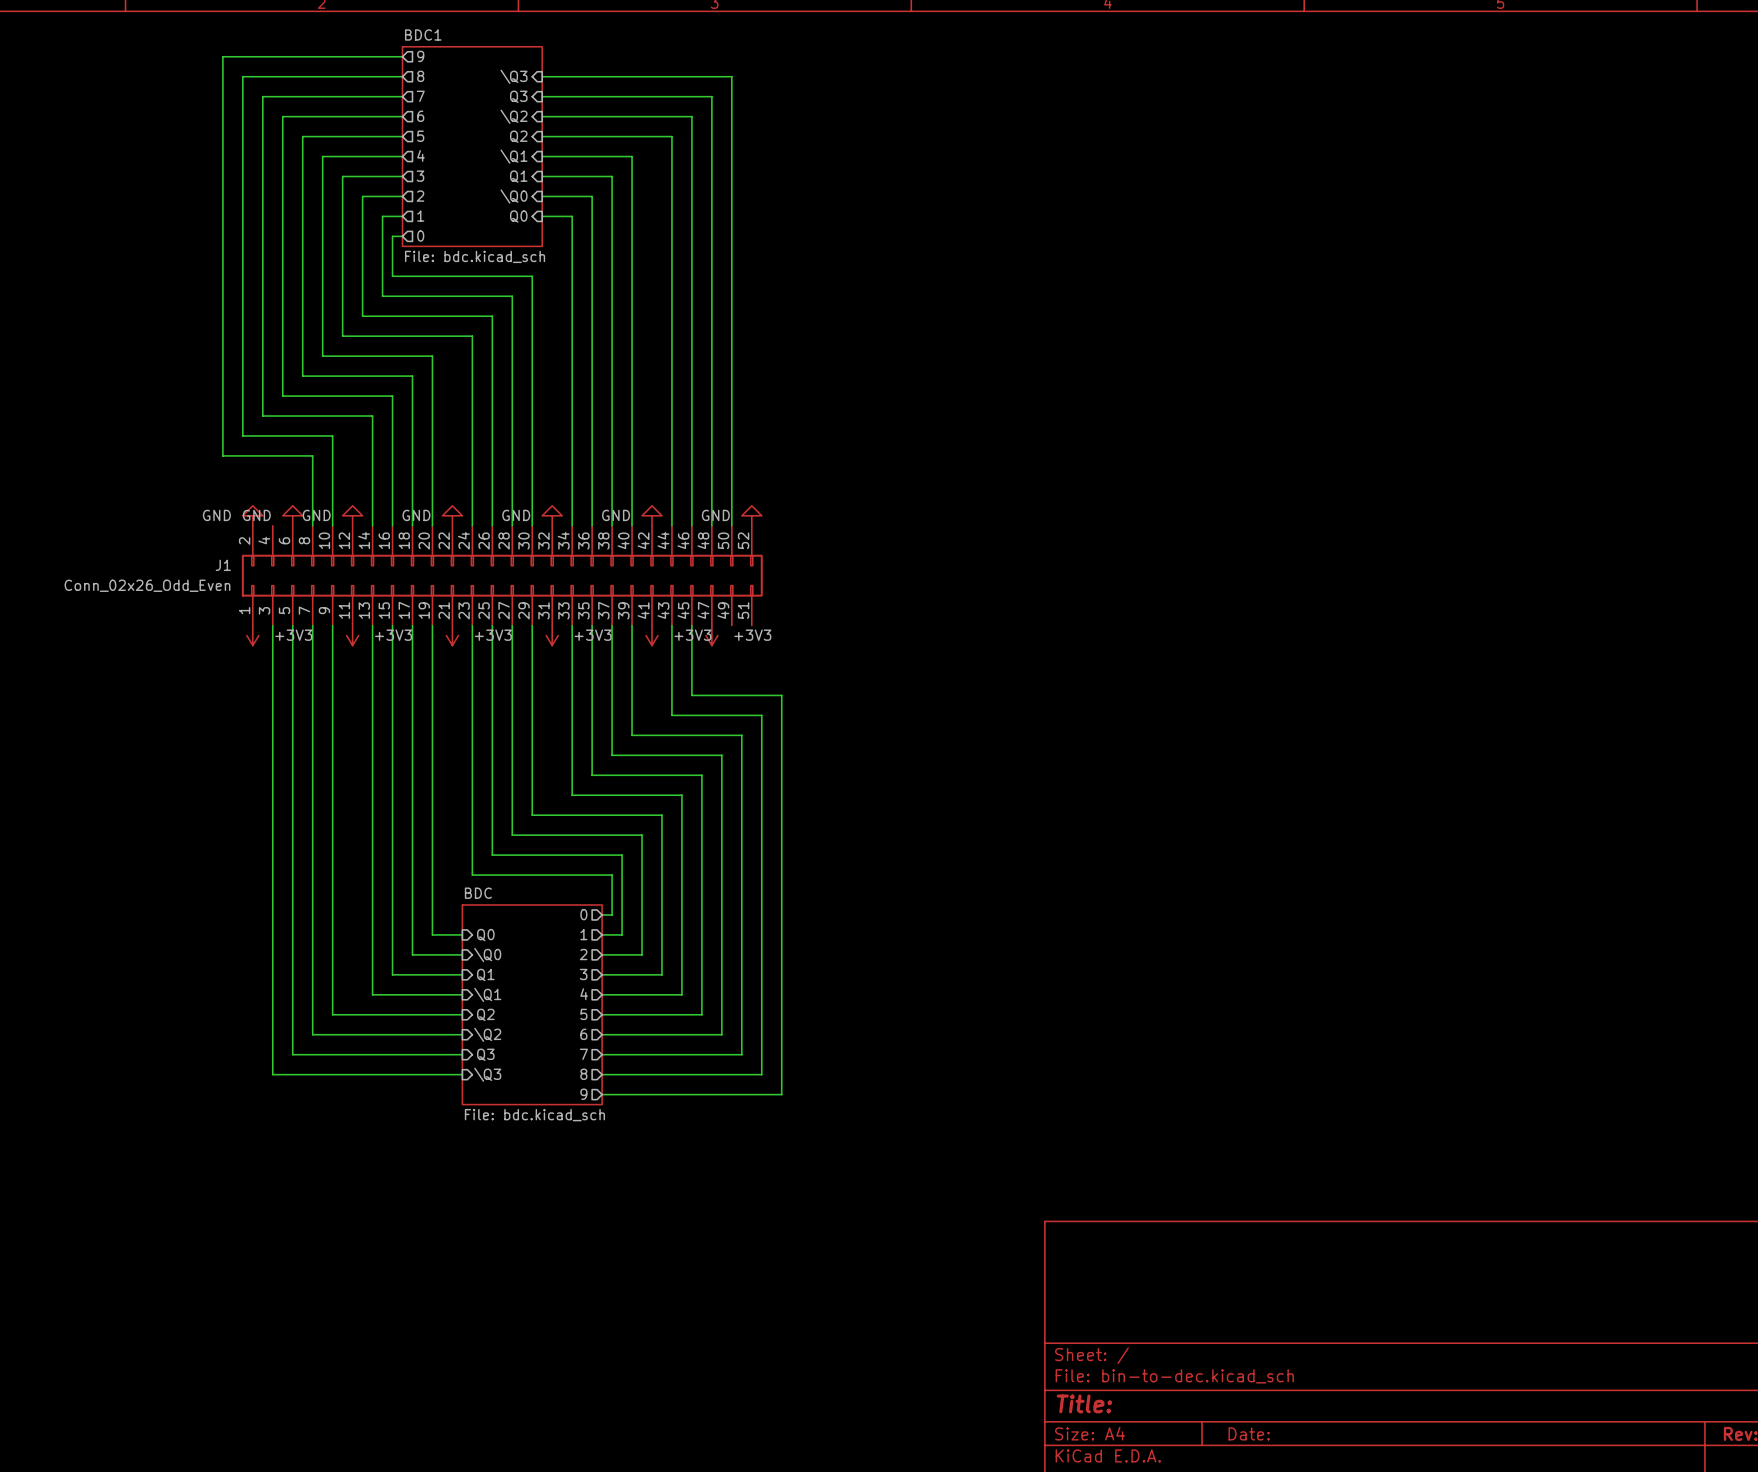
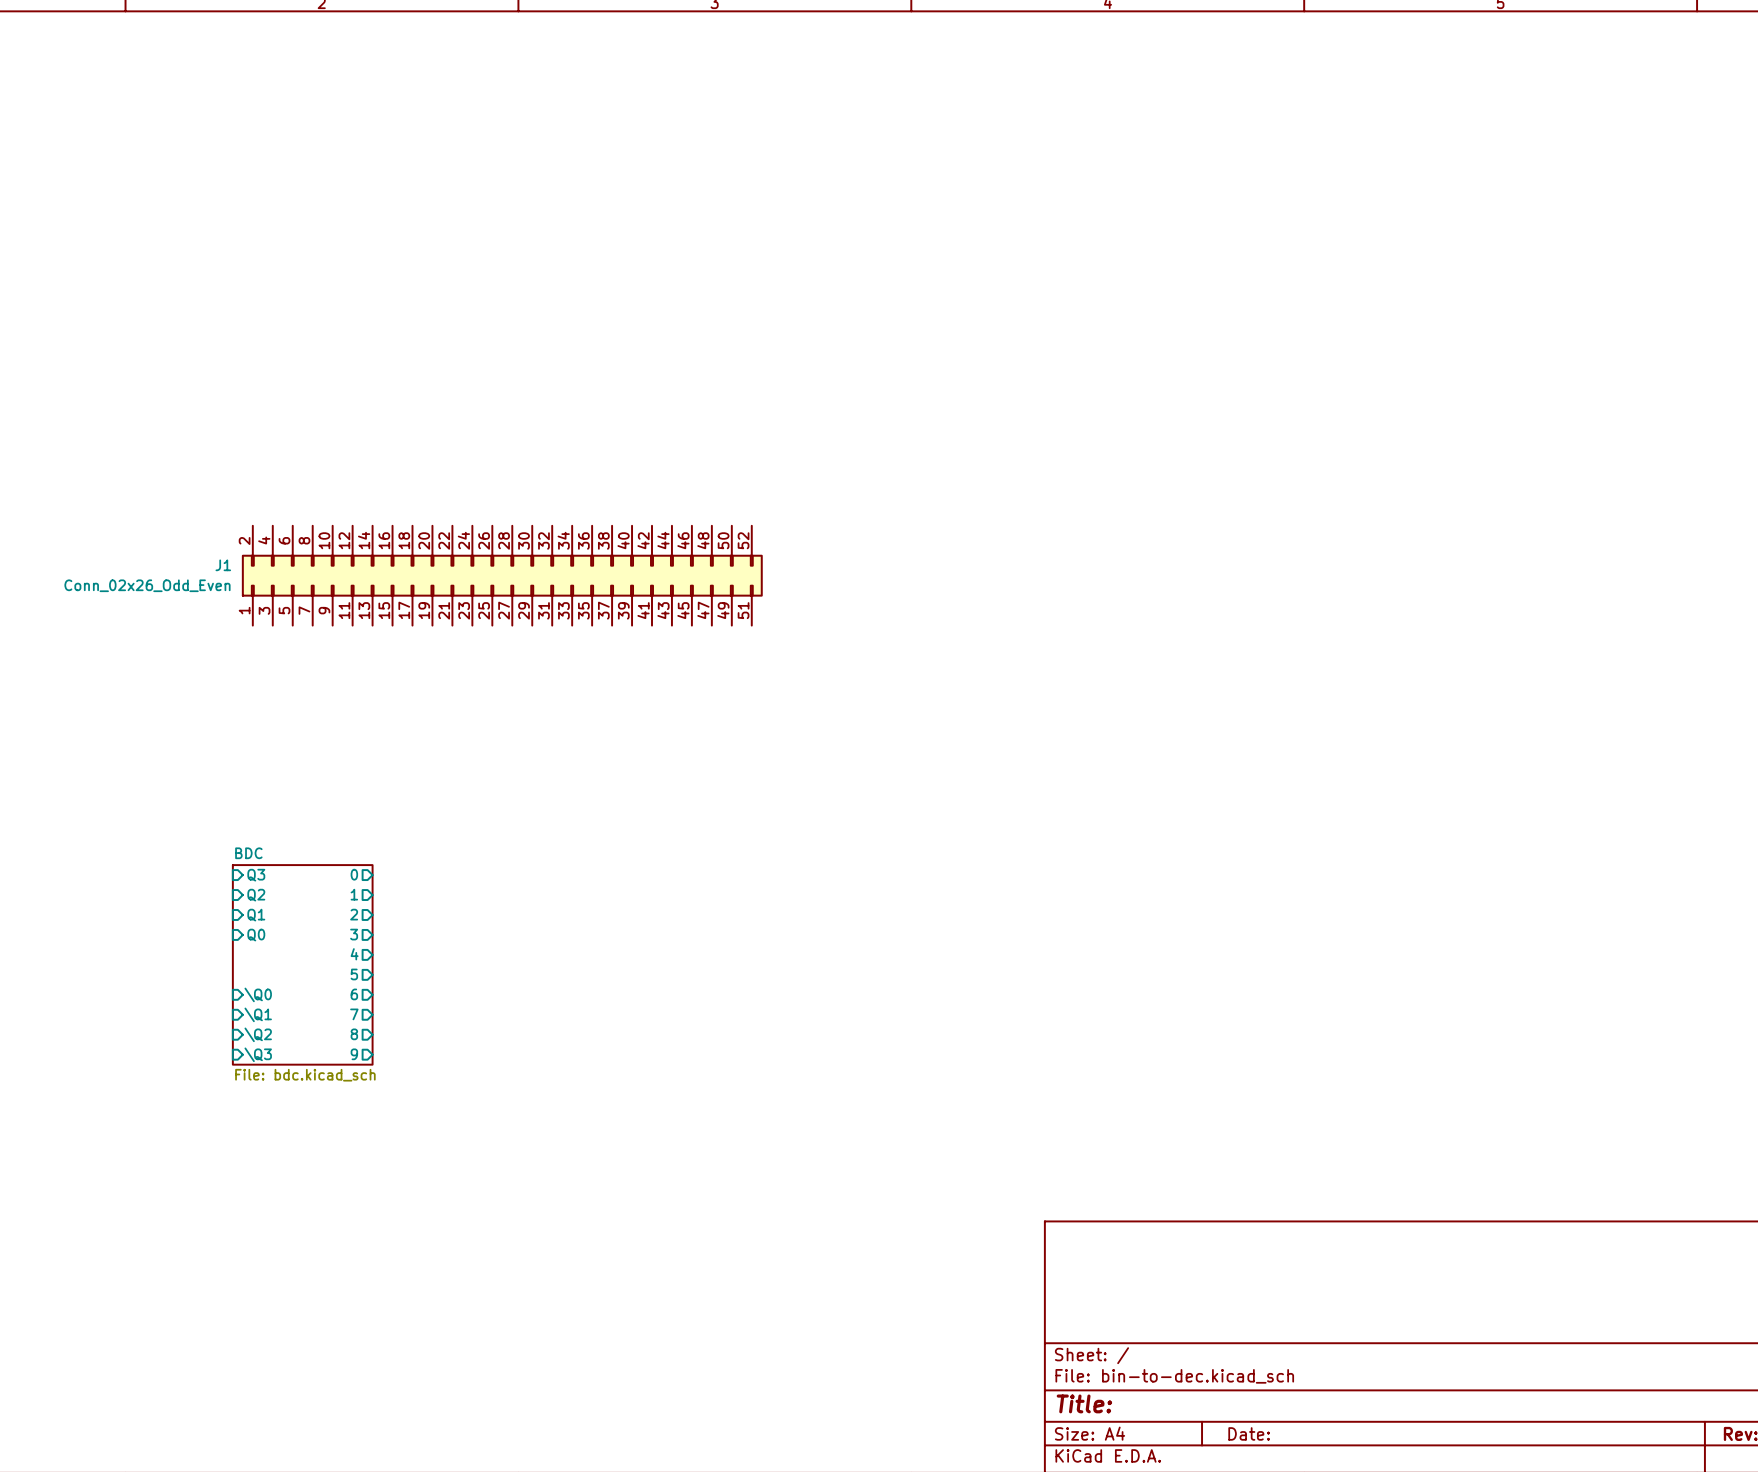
wire: (402, 56) (222, 56) (222, 455) (312, 455) (312, 525) -> none
sheet pin: 9 (420, 56) -> none
wire: (402, 76) (242, 76) (242, 435) (332, 435) (332, 525) -> none
sheet pin: 8 (420, 76) -> none
sheet pin: \Q3 (514, 76) -> none
wire: (542, 76) (731, 76) (731, 525) -> none
wire: (402, 96) (262, 96) (262, 416) (372, 416) (372, 525) -> none
sheet pin: 7 (420, 96) -> none
sheet pin: Q3 (518, 96) -> none
wire: (542, 96) (711, 96) (711, 525) -> none
wire: (402, 116) (282, 116) (282, 396) (392, 396) (392, 525) -> none
sheet pin: 6 (420, 116) -> none
sheet pin: \Q2 (514, 116) -> none
wire: (542, 116) (691, 116) (691, 525) -> none
wire: (402, 136) (302, 136) (302, 376) (412, 376) (412, 525) -> none
sheet pin: 5 (420, 136) -> none
sheet pin: Q2 (518, 136) -> none
wire: (542, 136) (671, 136) (671, 525) -> none
sheet BDC1: File: bdc.kicad_sch (472, 146) -> none
sheet pin: 4 (420, 155) -> none
wire: (402, 156) (322, 156) (322, 356) (432, 356) (432, 525) -> none
sheet pin: \Q1 (514, 156) -> none
wire: (542, 156) (632, 156) (632, 525) -> none
wire: (402, 176) (342, 176) (342, 336) (472, 336) (472, 525) -> none
sheet pin: 3 (420, 176) -> none
sheet pin: Q1 (518, 176) -> none
wire: (542, 176) (612, 176) (612, 525) -> none
wire: (402, 196) (362, 196) (362, 316) (492, 316) (492, 525) -> none
sheet pin: 2 (420, 196) -> none
sheet pin: \Q0 (514, 196) -> none
wire: (542, 196) (592, 196) (592, 525) -> none
wire: (402, 216) (382, 216) (382, 296) (512, 296) (512, 525) -> none
sheet pin: 1 (420, 216) -> none
sheet pin: Q0 (518, 216) -> none
wire: (542, 216) (572, 216) (572, 525) -> none
wire: (402, 236) (392, 236) (392, 276) (532, 276) (532, 525) -> none
sheet pin: 0 (420, 236) -> none
power symbol: GND (252, 515) -> none
power symbol: GND (292, 515) -> none
power symbol: GND (352, 515) -> none
power symbol: GND (452, 515) -> none
power symbol: GND (552, 515) -> none
power symbol: GND (651, 515) -> none
power symbol: GND (751, 515) -> none
wire: (272, 625) (272, 1074) (462, 1074) -> none
wire: (292, 625) (292, 1054) (462, 1054) -> none
wire: (312, 625) (312, 1034) (462, 1034) -> none
wire: (332, 625) (332, 1014) (462, 1014) -> none
wire: (372, 625) (372, 994) (462, 994) -> none
wire: (392, 625) (392, 974) (462, 974) -> none
wire: (412, 625) (412, 954) (462, 954) -> none
wire: (432, 625) (432, 934) (462, 934) -> none
wire: (472, 625) (472, 875) (612, 875) (612, 914) (602, 914) -> none
wire: (492, 625) (492, 855) (622, 855) (622, 934) (602, 934) -> none
wire: (512, 625) (512, 835) (642, 835) (642, 954) (602, 954) -> none
wire: (532, 625) (532, 815) (661, 815) (661, 974) (602, 974) -> none
wire: (572, 625) (572, 795) (681, 795) (681, 994) (602, 994) -> none
wire: (592, 625) (592, 775) (701, 775) (701, 1014) (602, 1014) -> none
wire: (612, 625) (612, 755) (721, 755) (721, 1034) (602, 1034) -> none
wire: (632, 625) (632, 735) (741, 735) (741, 1054) (602, 1054) -> none
wire: (671, 625) (671, 715) (761, 715) (761, 1074) (602, 1074) -> none
wire: (691, 625) (691, 695) (781, 695) (781, 1094) (602, 1094) -> none
power symbol: +3V3 (252, 635) -> none
power symbol: +3V3 (352, 635) -> none
power symbol: +3V3 (452, 635) -> none
power symbol: +3V3 (552, 635) -> none
power symbol: +3V3 (651, 635) -> none
power symbol: +3V3 (711, 635) -> none
sheet pin: none -> 0 (354, 874)
sheet pin: none -> Q3 (256, 875)
sheet pin: none -> 1 (354, 894)
sheet pin: none -> Q2 (256, 895)
sheet pin: none -> 2 (354, 914)
sheet pin: 0 (583, 914) -> none
sheet pin: none -> Q1 (256, 915)
sheet pin: none -> 3 (354, 934)
sheet pin: 1 (583, 934) -> none
sheet pin: none -> Q0 (256, 935)
sheet pin: Q0 (485, 935) -> none
sheet pin: none -> 4 (354, 954)
sheet pin: 2 (583, 954) -> none
sheet pin: \Q0 (487, 955) -> none
sheet BDC: none -> File: bdc.kicad_sch (302, 964)
sheet pin: none -> 5 (354, 974)
sheet pin: Q1 (485, 974) -> none
sheet pin: 3 (583, 974) -> none
sheet pin: none -> \Q0 (258, 994)
sheet pin: none -> 6 (354, 994)
sheet pin: \Q1 (487, 994) -> none
sheet pin: 4 (584, 994) -> none
sheet BDC: File: bdc.kicad_sch (532, 1004) -> none
sheet pin: none -> \Q1 (258, 1014)
sheet pin: none -> 7 (354, 1014)
sheet pin: Q2 (485, 1014) -> none
sheet pin: 5 (583, 1014) -> none
sheet pin: none -> \Q2 (258, 1034)
sheet pin: none -> 8 (354, 1034)
sheet pin: \Q2 (487, 1034) -> none
sheet pin: 6 (583, 1034) -> none
sheet pin: none -> \Q3 (258, 1054)
sheet pin: none -> 9 (354, 1054)
sheet pin: Q3 (485, 1054) -> none
sheet pin: 7 (583, 1054) -> none
sheet pin: \Q3 (487, 1074) -> none
sheet pin: 8 (583, 1074) -> none
sheet pin: 9 (583, 1094) -> none

